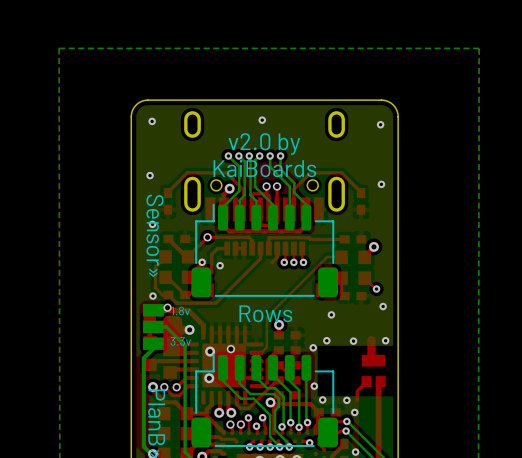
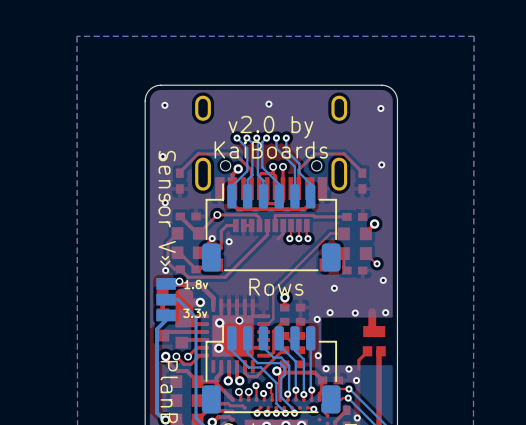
text: Sensor» (154, 235) -> Sensor V» (167, 208)

